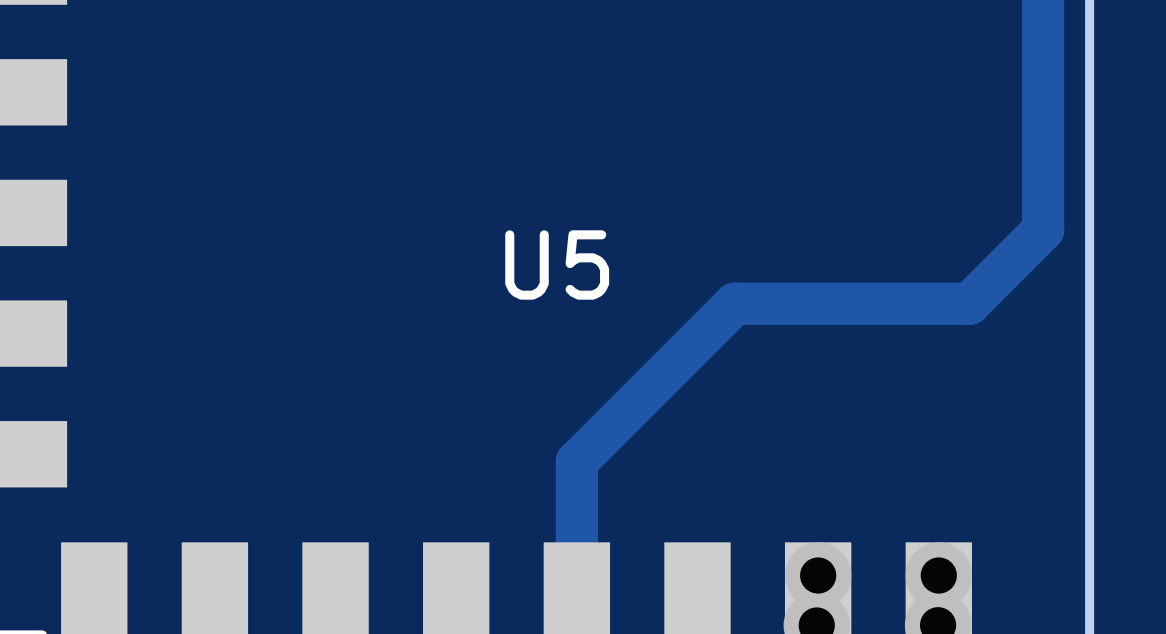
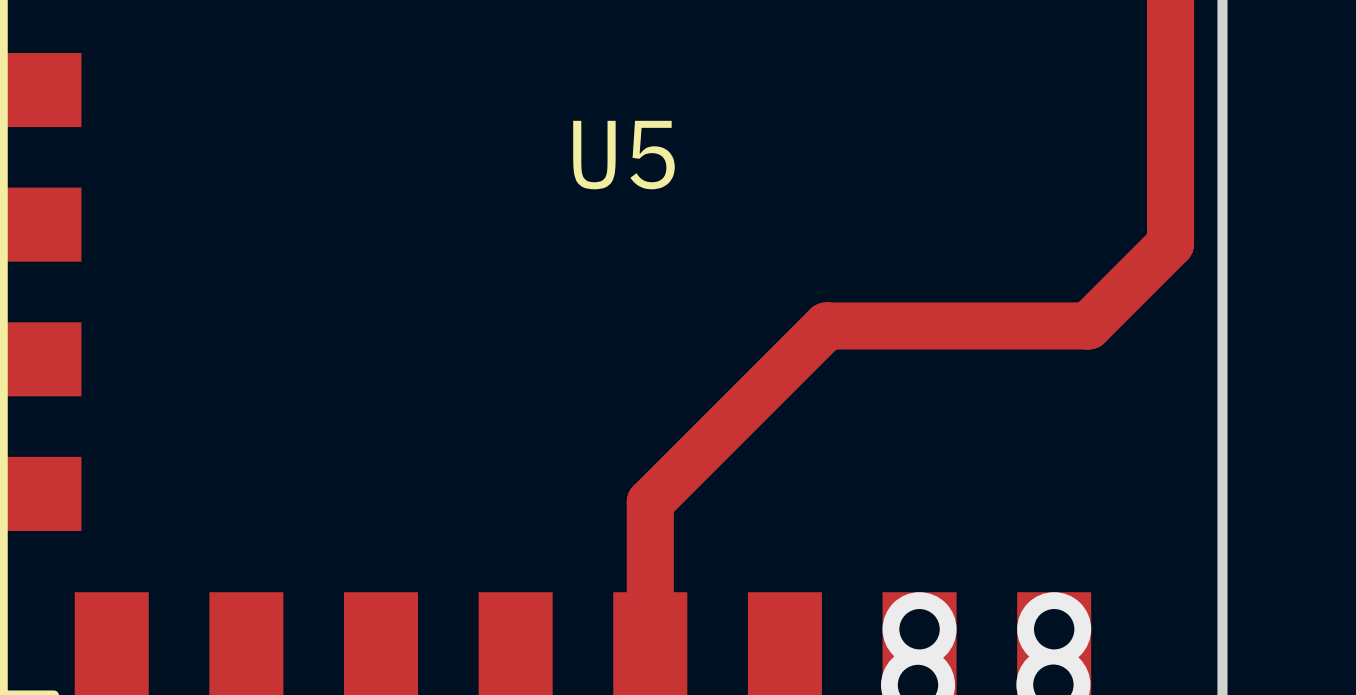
U5 name position: U5 (557, 265) -> U5 (623, 155)

